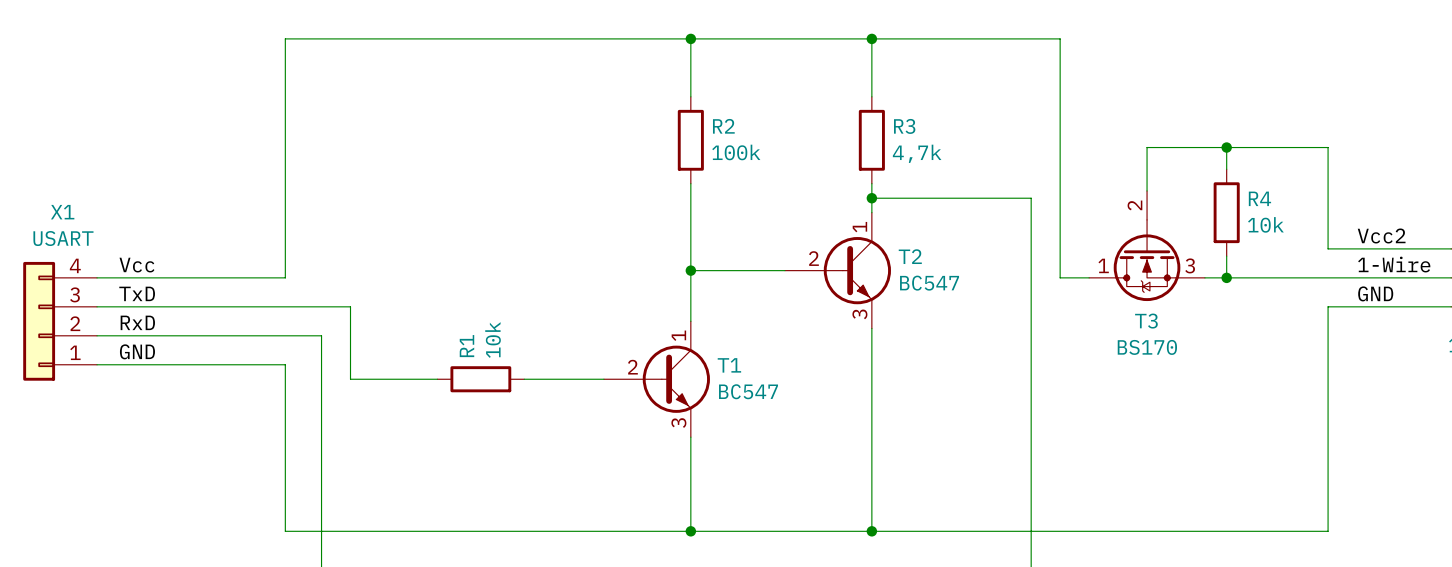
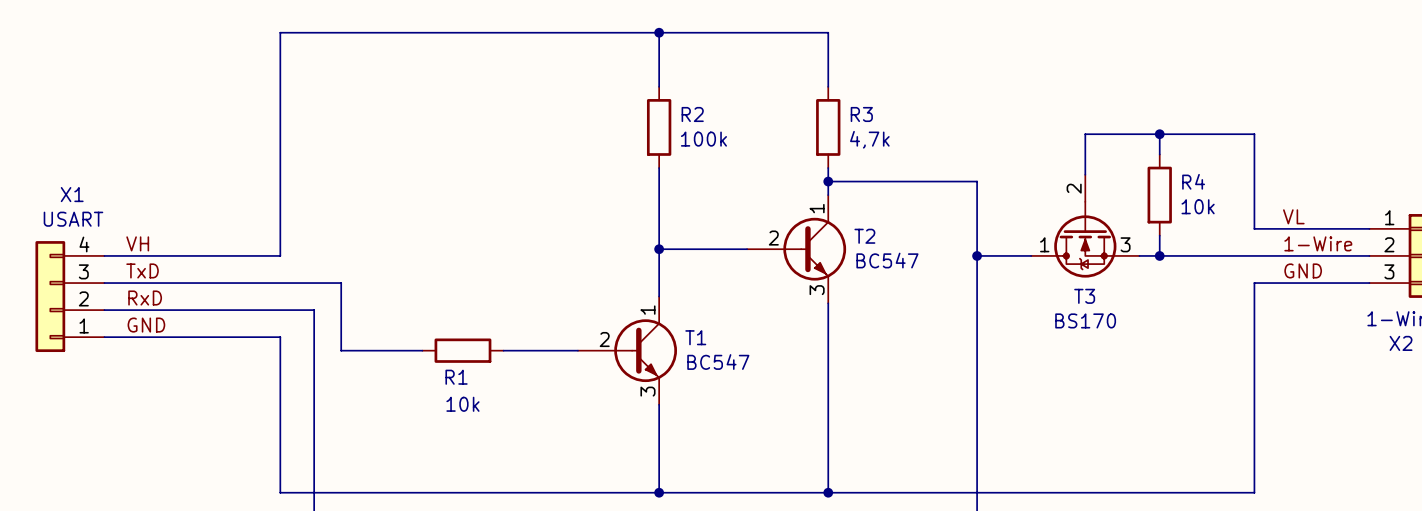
wire: (871, 38) (1060, 38) (1060, 277) -> (977, 255) (1004, 255)
junction: (871, 38) -> none
label: Vcc2 (1381, 235) -> VL (1293, 216)
label: Vcc (136, 265) -> VH (137, 243)
junction: none -> (977, 255)
R1 value rotation: 0° (493, 340) -> 90° clockwise (462, 404)
R1 value position: 10k (493, 340) -> 10k (462, 404)
R1 name rotation: 0° (466, 346) -> 90° clockwise (456, 377)
R1 name position: R1 (466, 346) -> R1 (456, 377)

